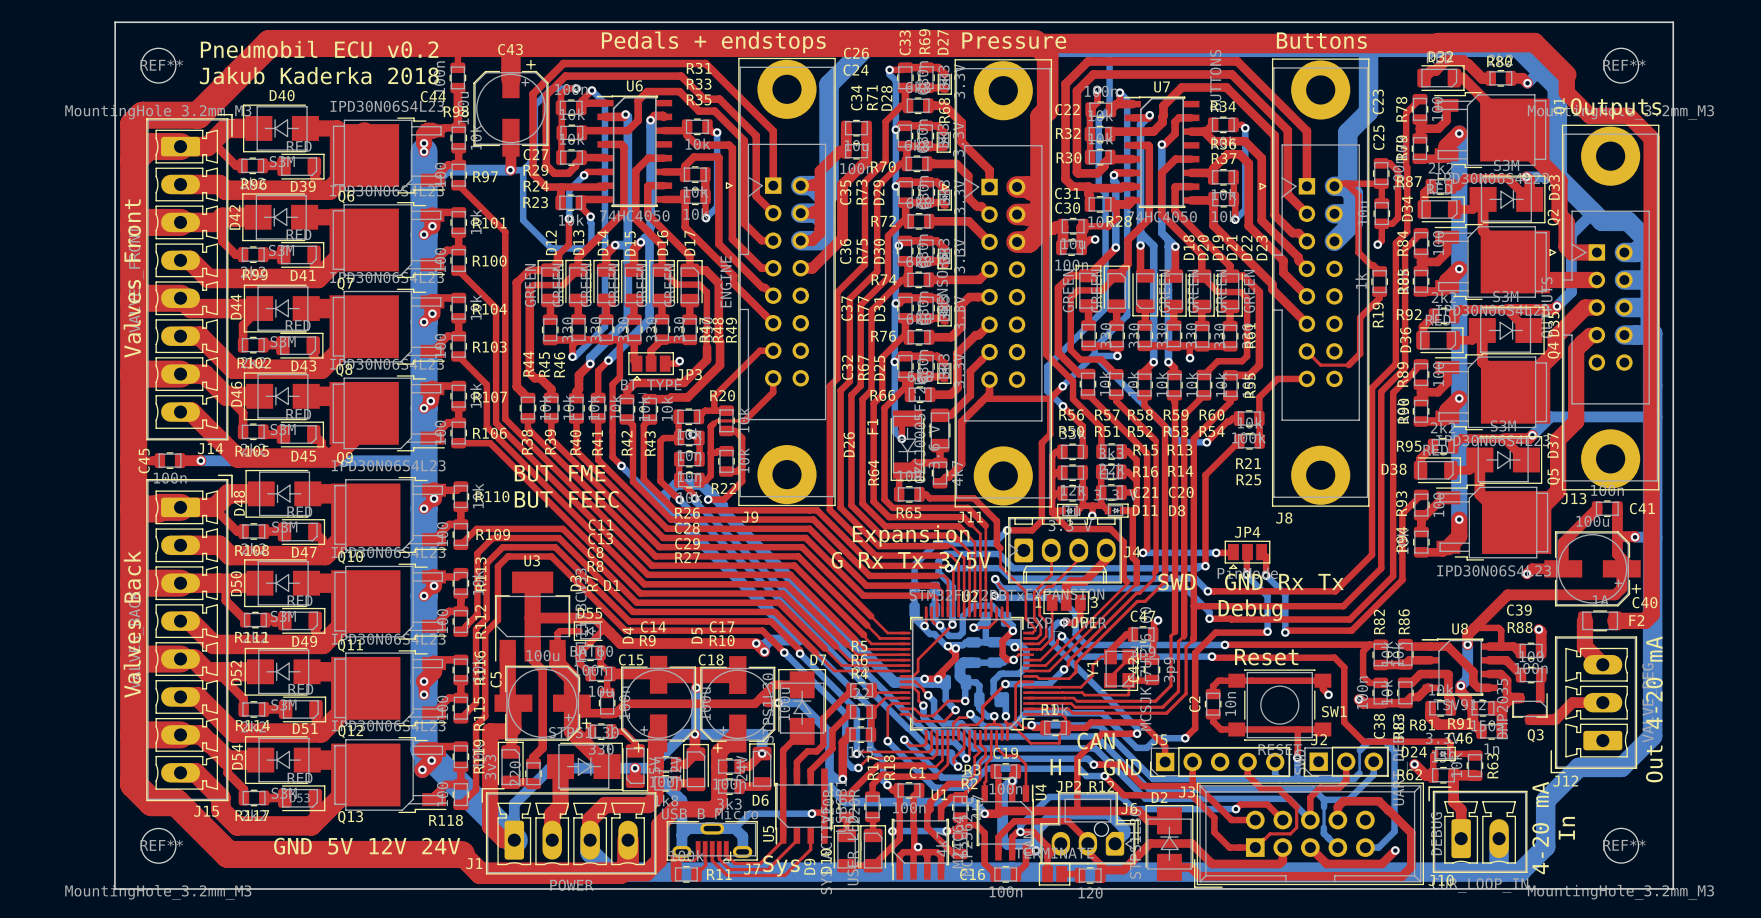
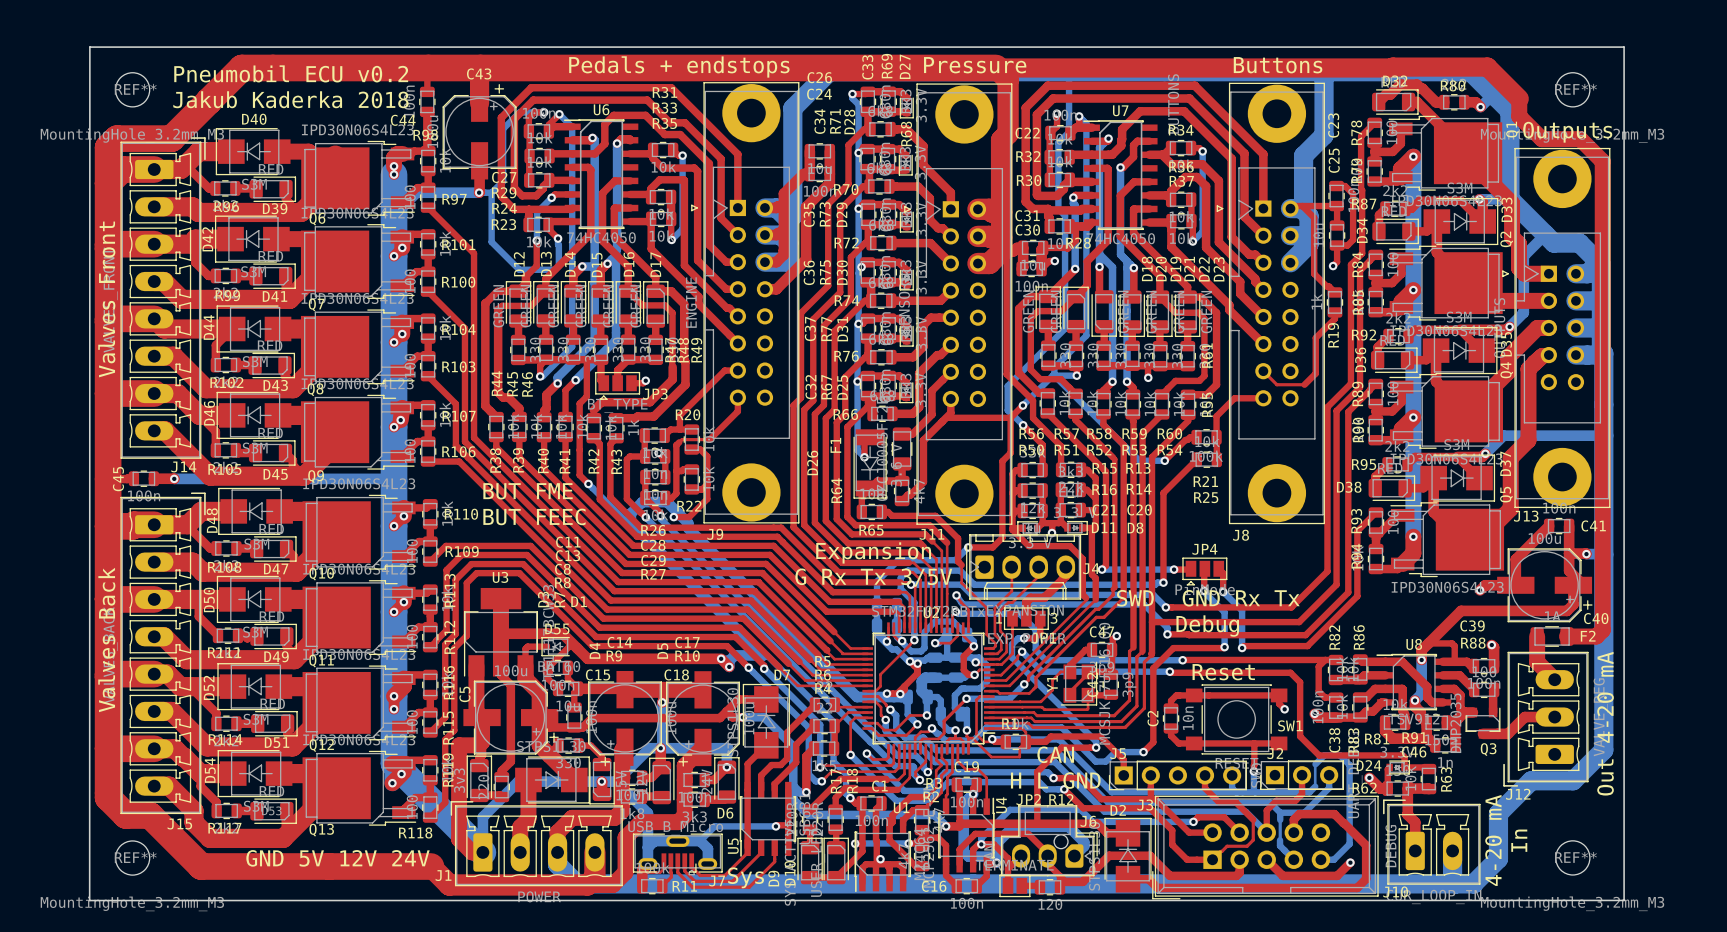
R43 value: 10k (667, 408) -> 1k (633, 427)

